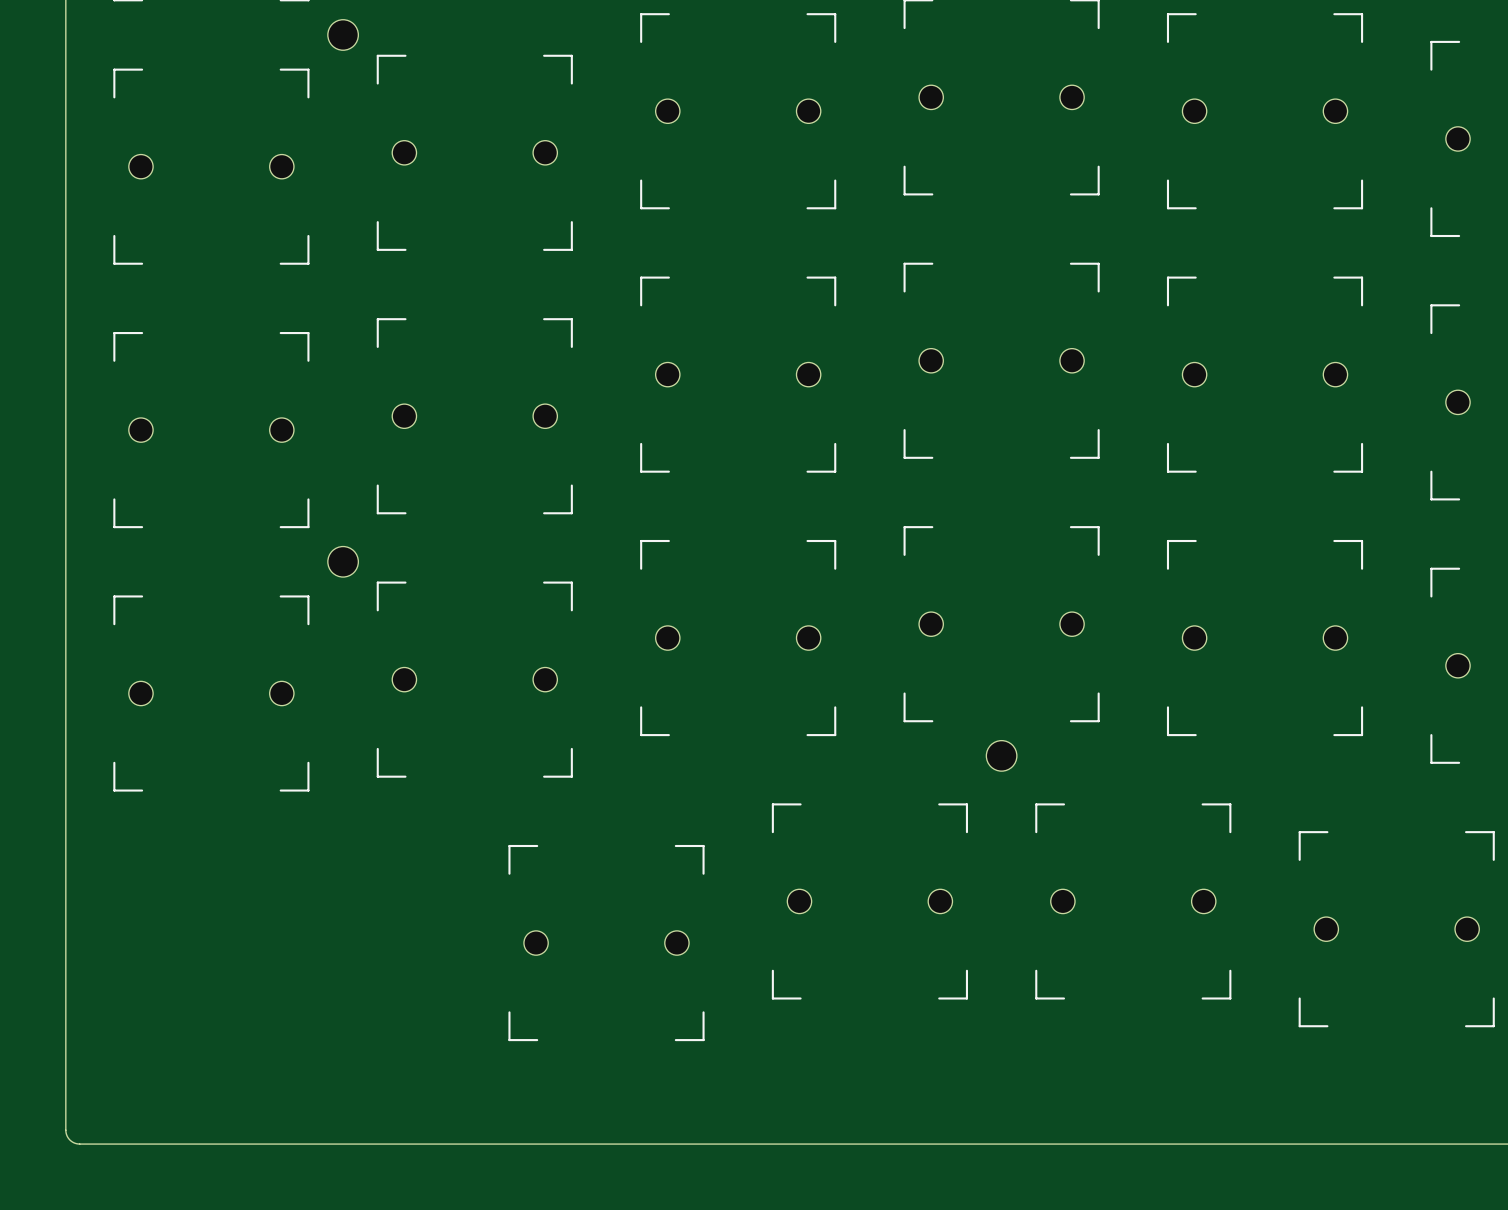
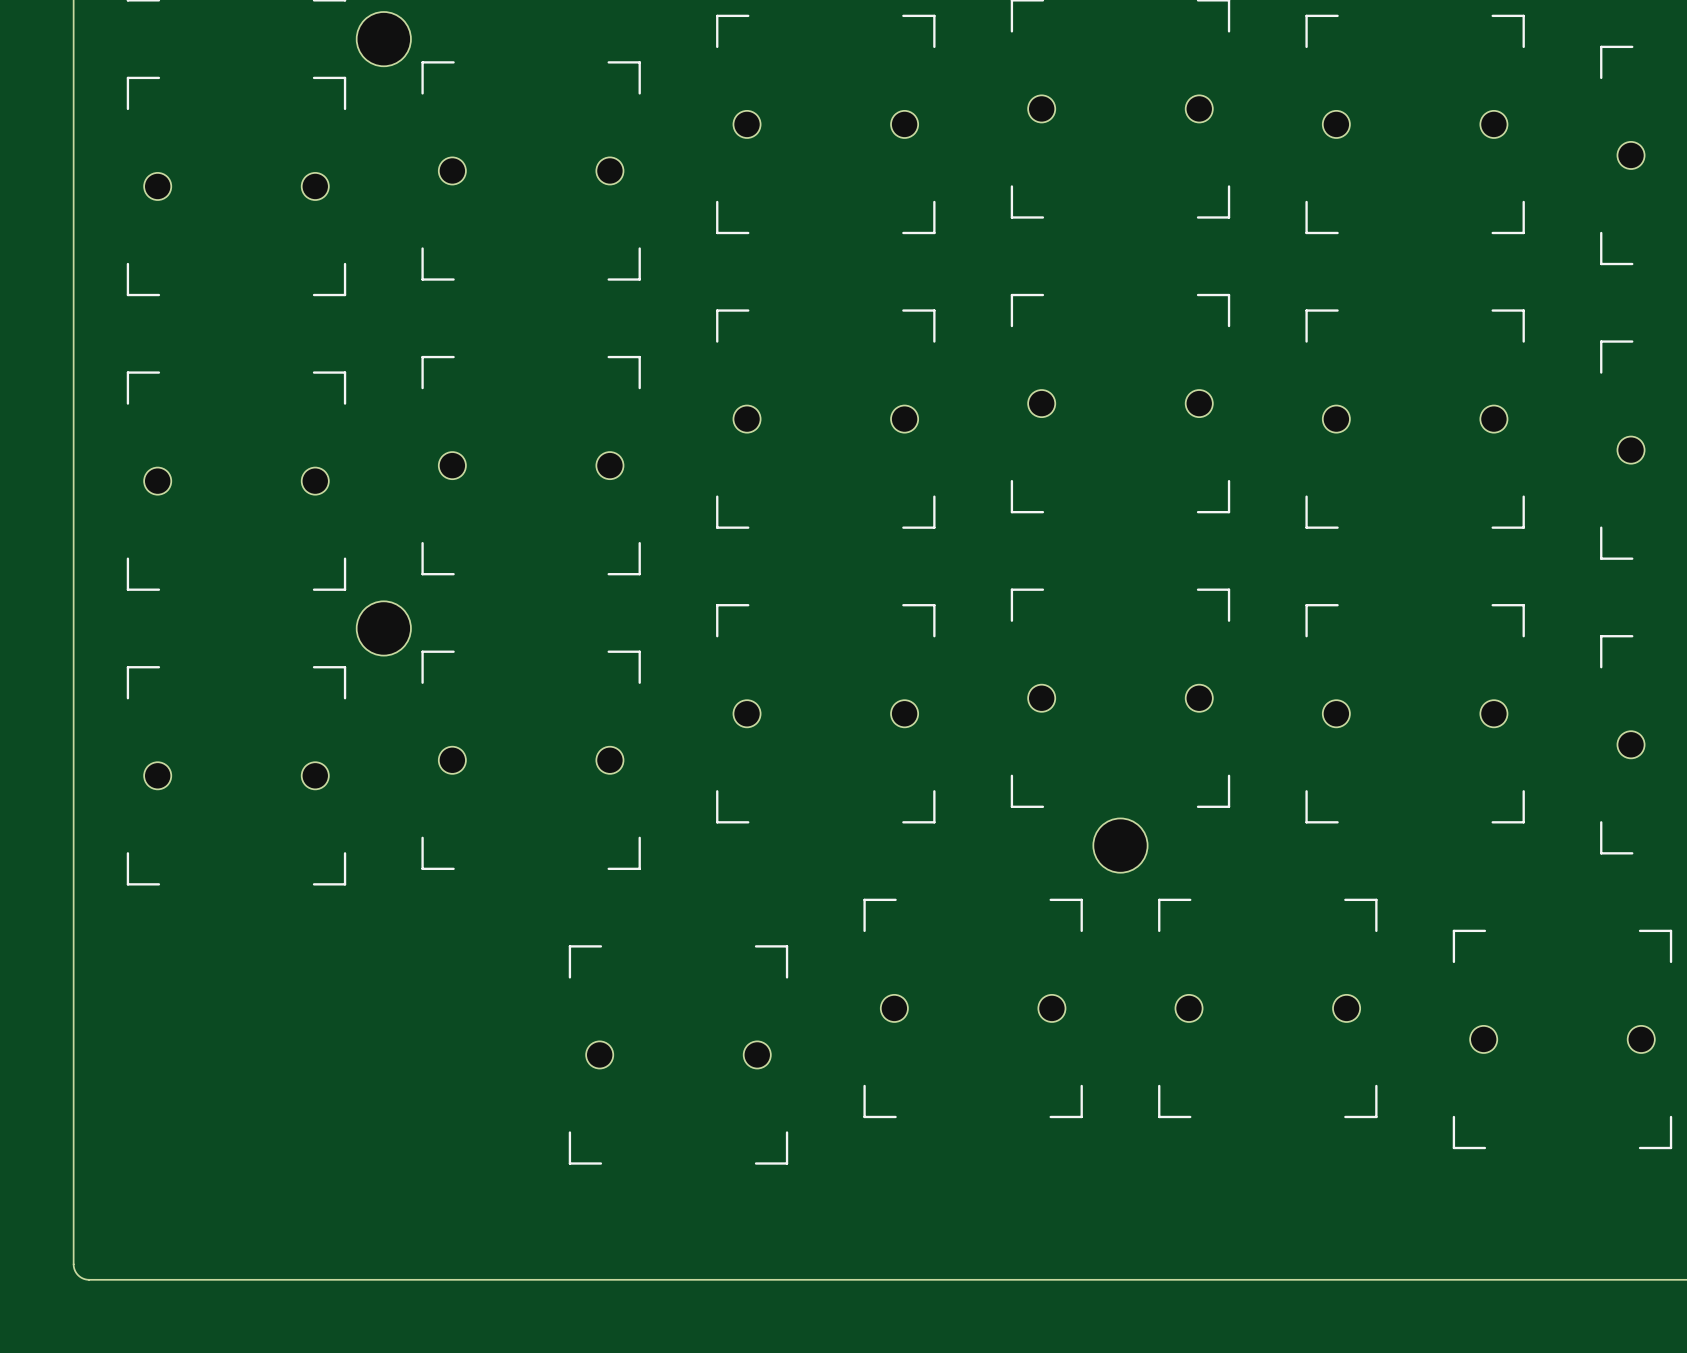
part footprint: [327, 19, 359, 51] -> [356, 11, 411, 67]
part footprint: [327, 546, 359, 578] -> [356, 601, 411, 656]
part footprint: [986, 740, 1017, 772] -> [1093, 818, 1148, 873]

